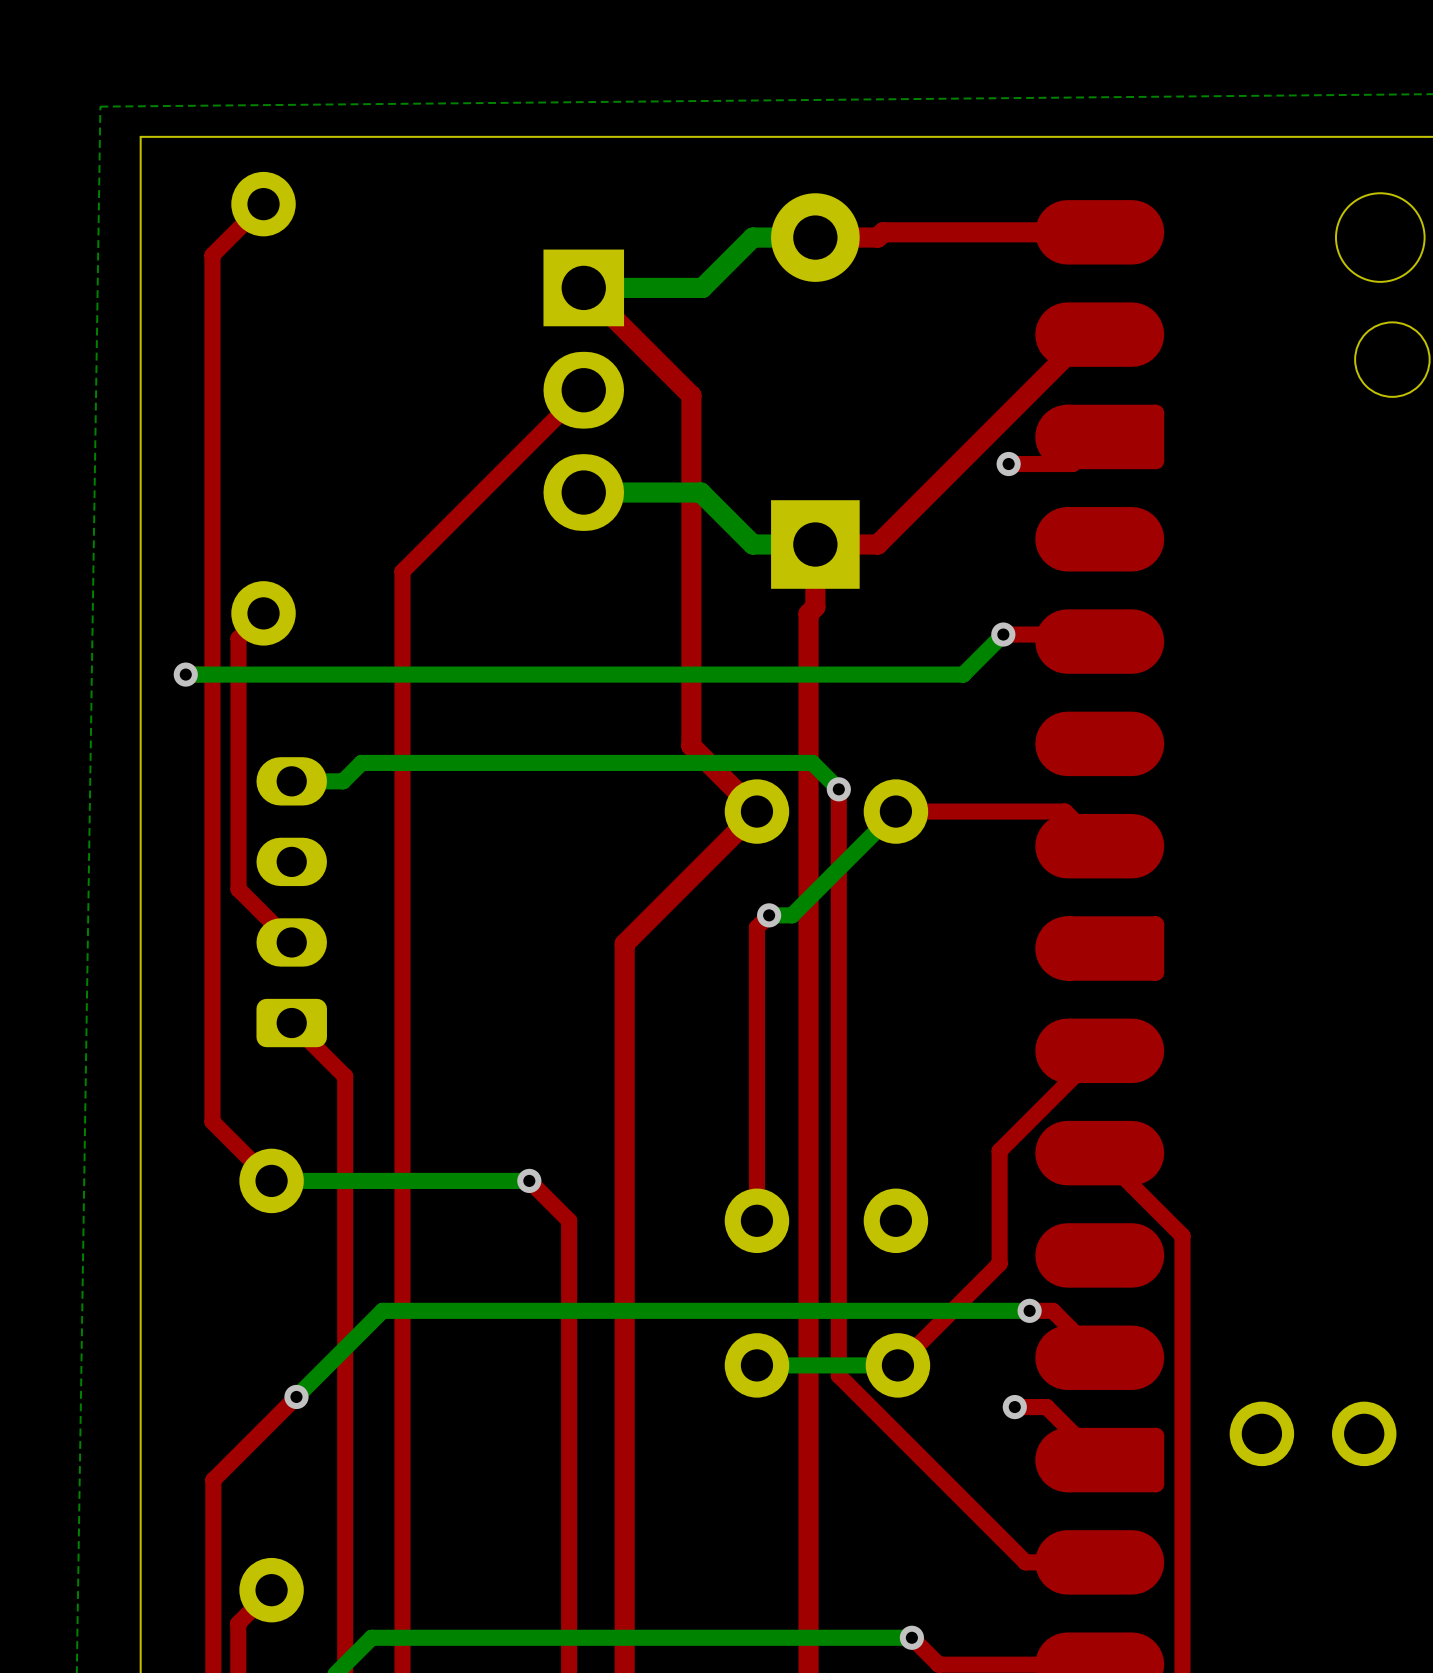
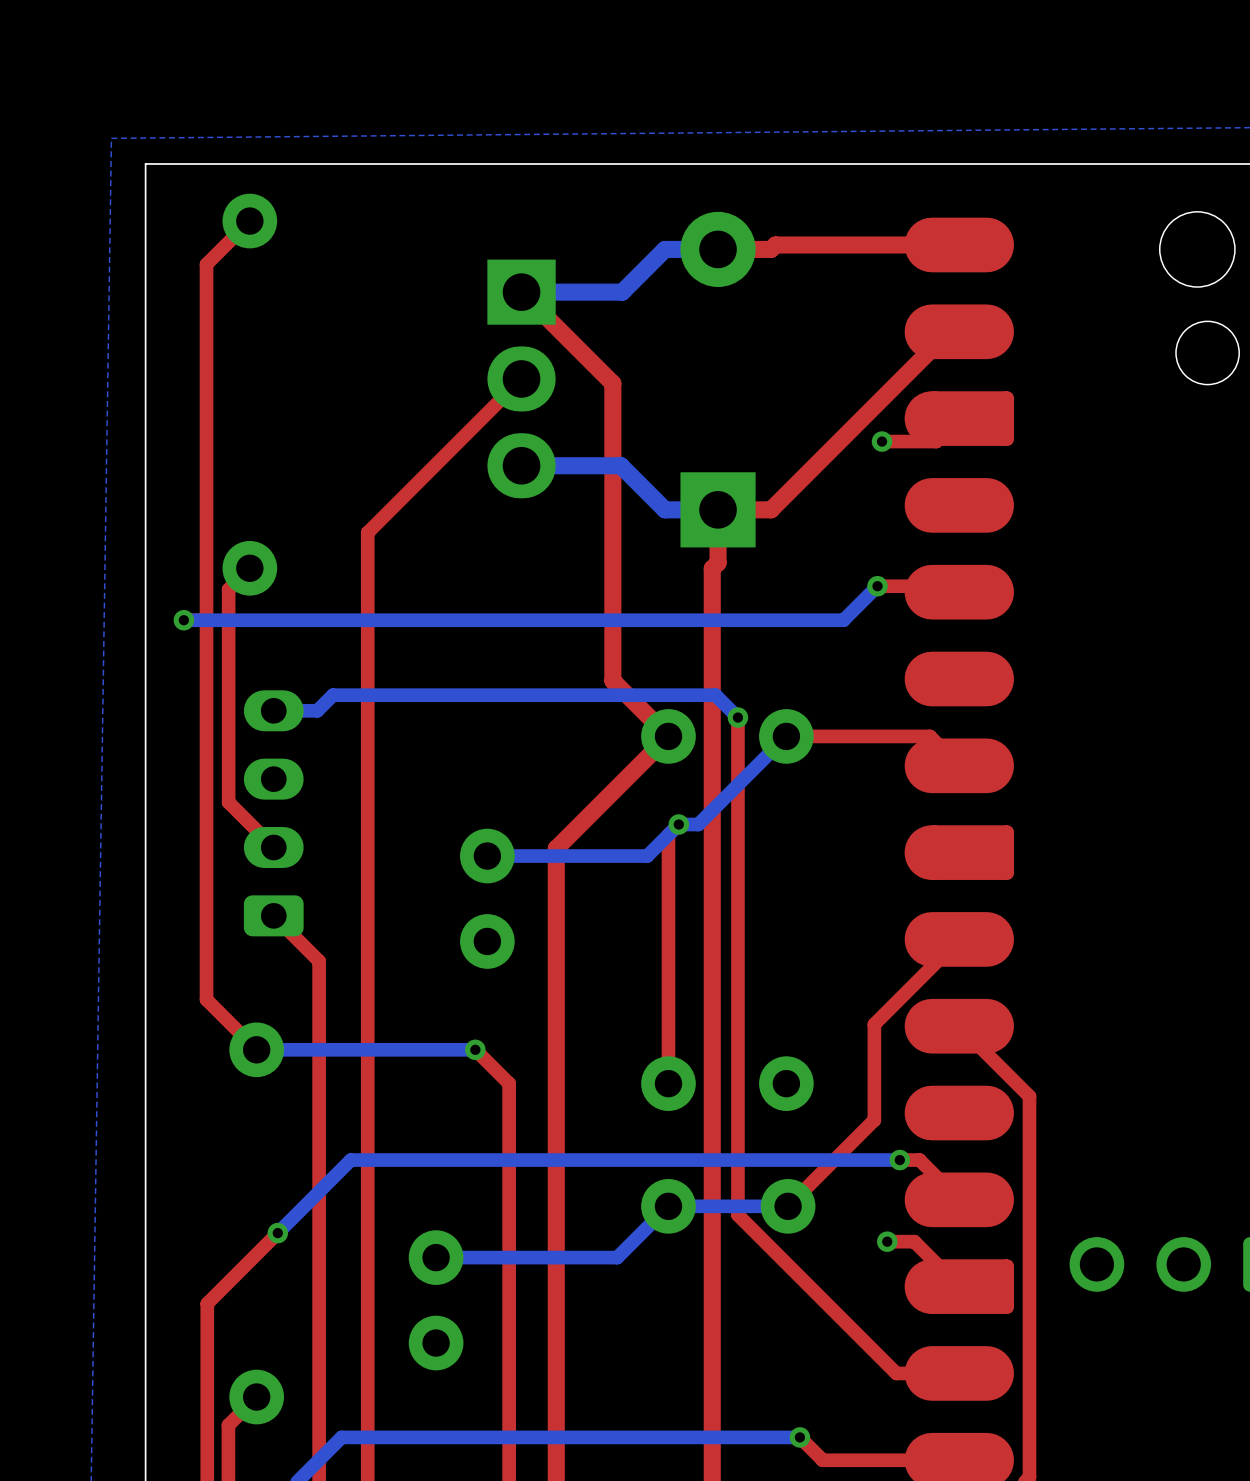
bottom track: none -> (678, 824) (647, 856) (487, 856)
part: none -> (487, 898)
bottom track: none -> (668, 1206) (617, 1257) (436, 1257)
part: none -> (436, 1300)

